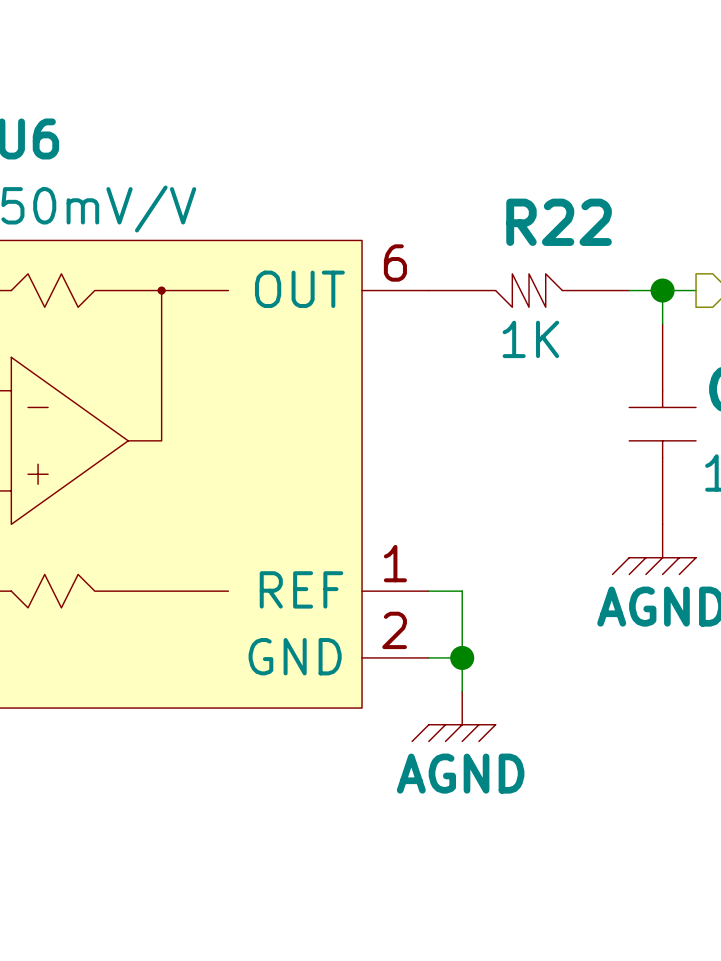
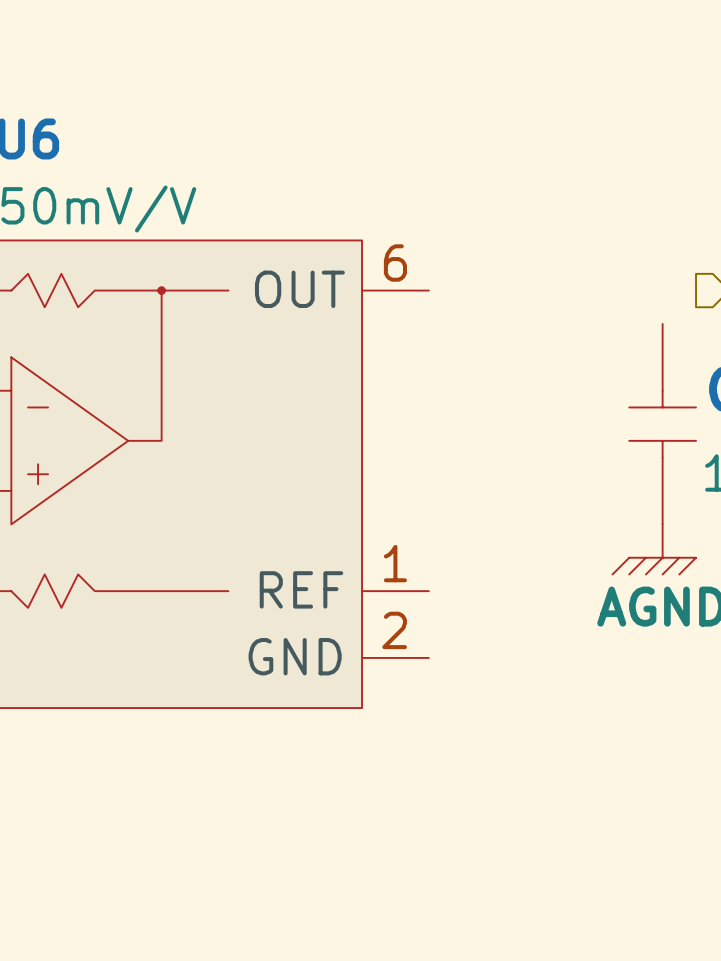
R22: 1K (529, 290) -> none
wire: (629, 290) (696, 290) -> none
wire: (662, 290) (662, 323) -> none
junction: (662, 290) -> none
wire: (428, 591) (462, 591) (462, 691) -> none
wire: (428, 657) (462, 657) -> none
junction: (462, 657) -> none
power symbol: AGND (453, 716) -> none

